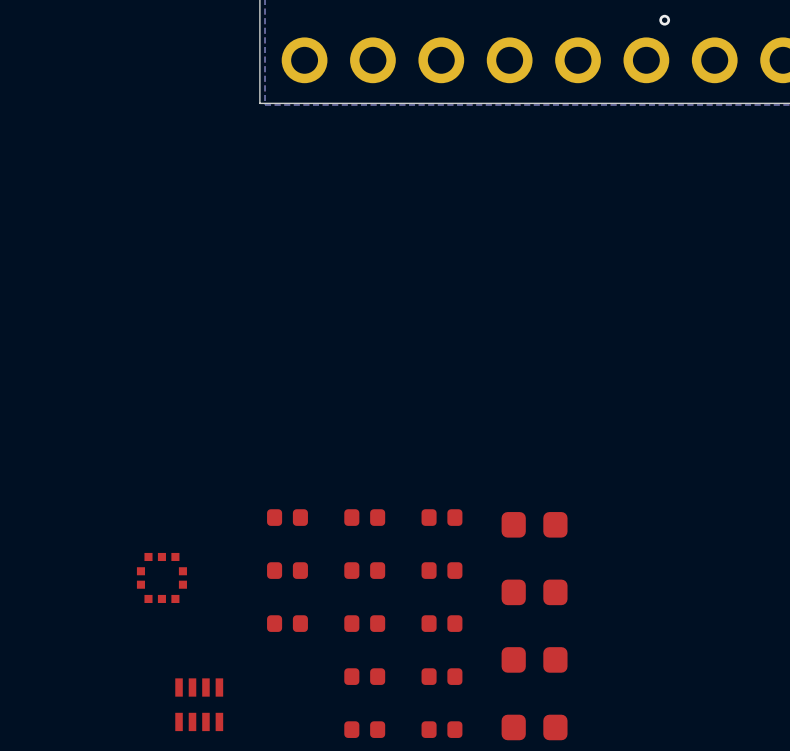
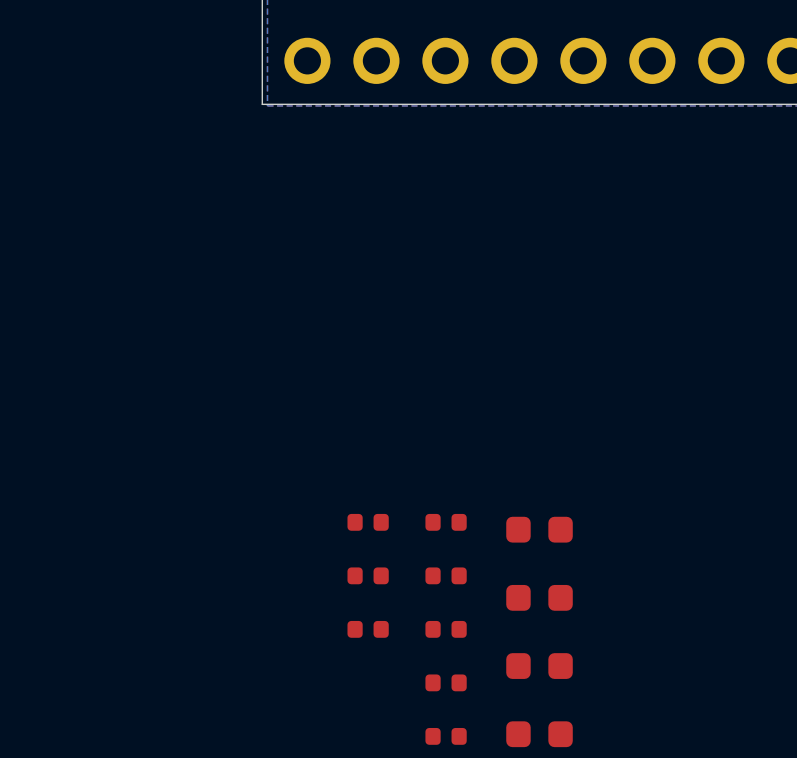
via: (664, 20) -> none
part: (287, 517) -> none
part: (287, 570) -> none
part: (161, 577) -> none
part: (287, 623) -> none
part: (364, 676) -> none
part: (199, 704) -> none
part: (364, 729) -> none

